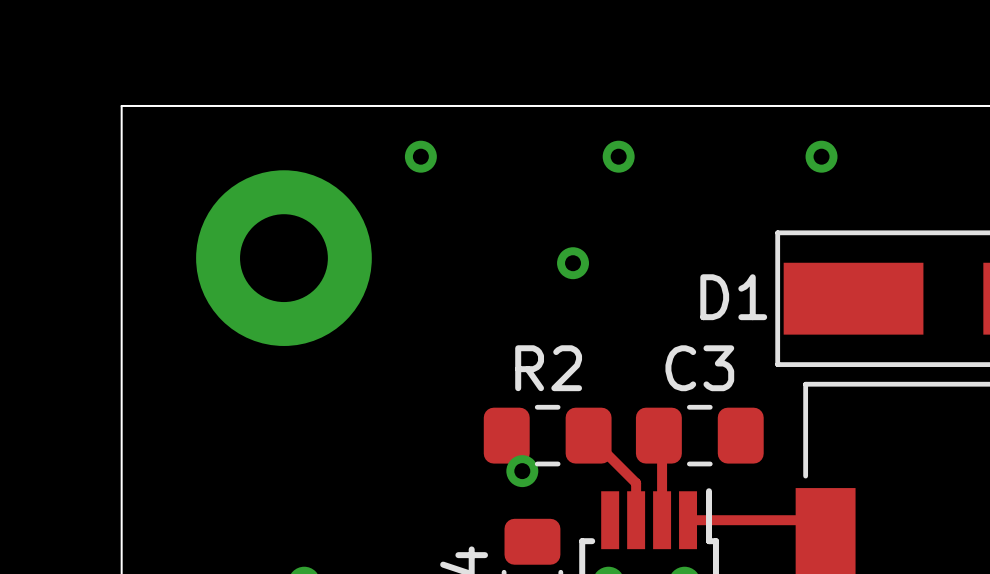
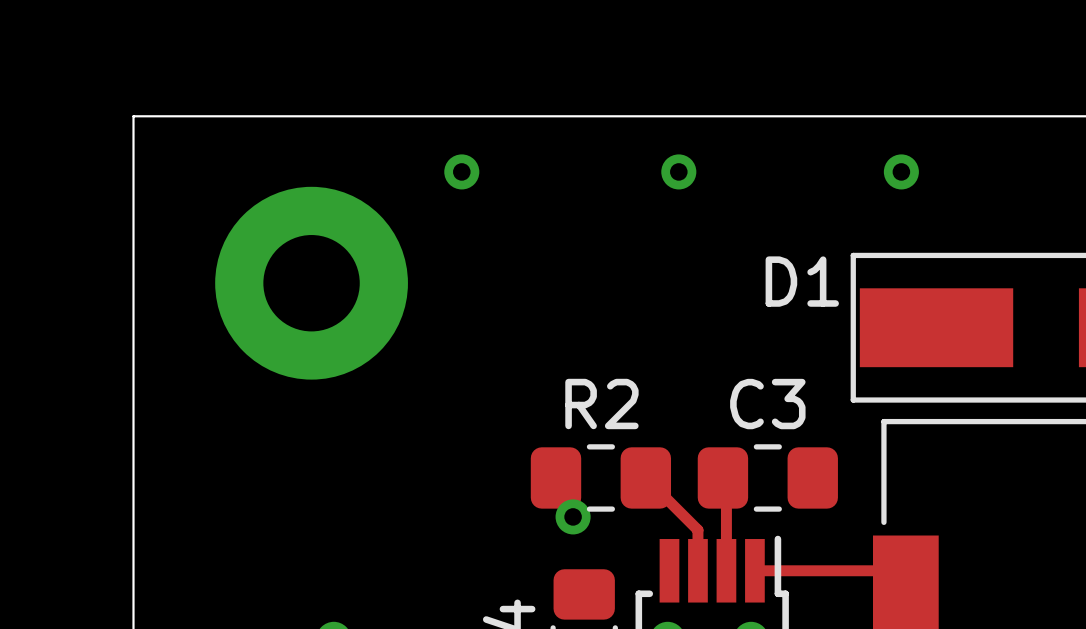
via: (573, 263) -> none
D1 name position: D1 (733, 297) -> D1 (802, 281)

